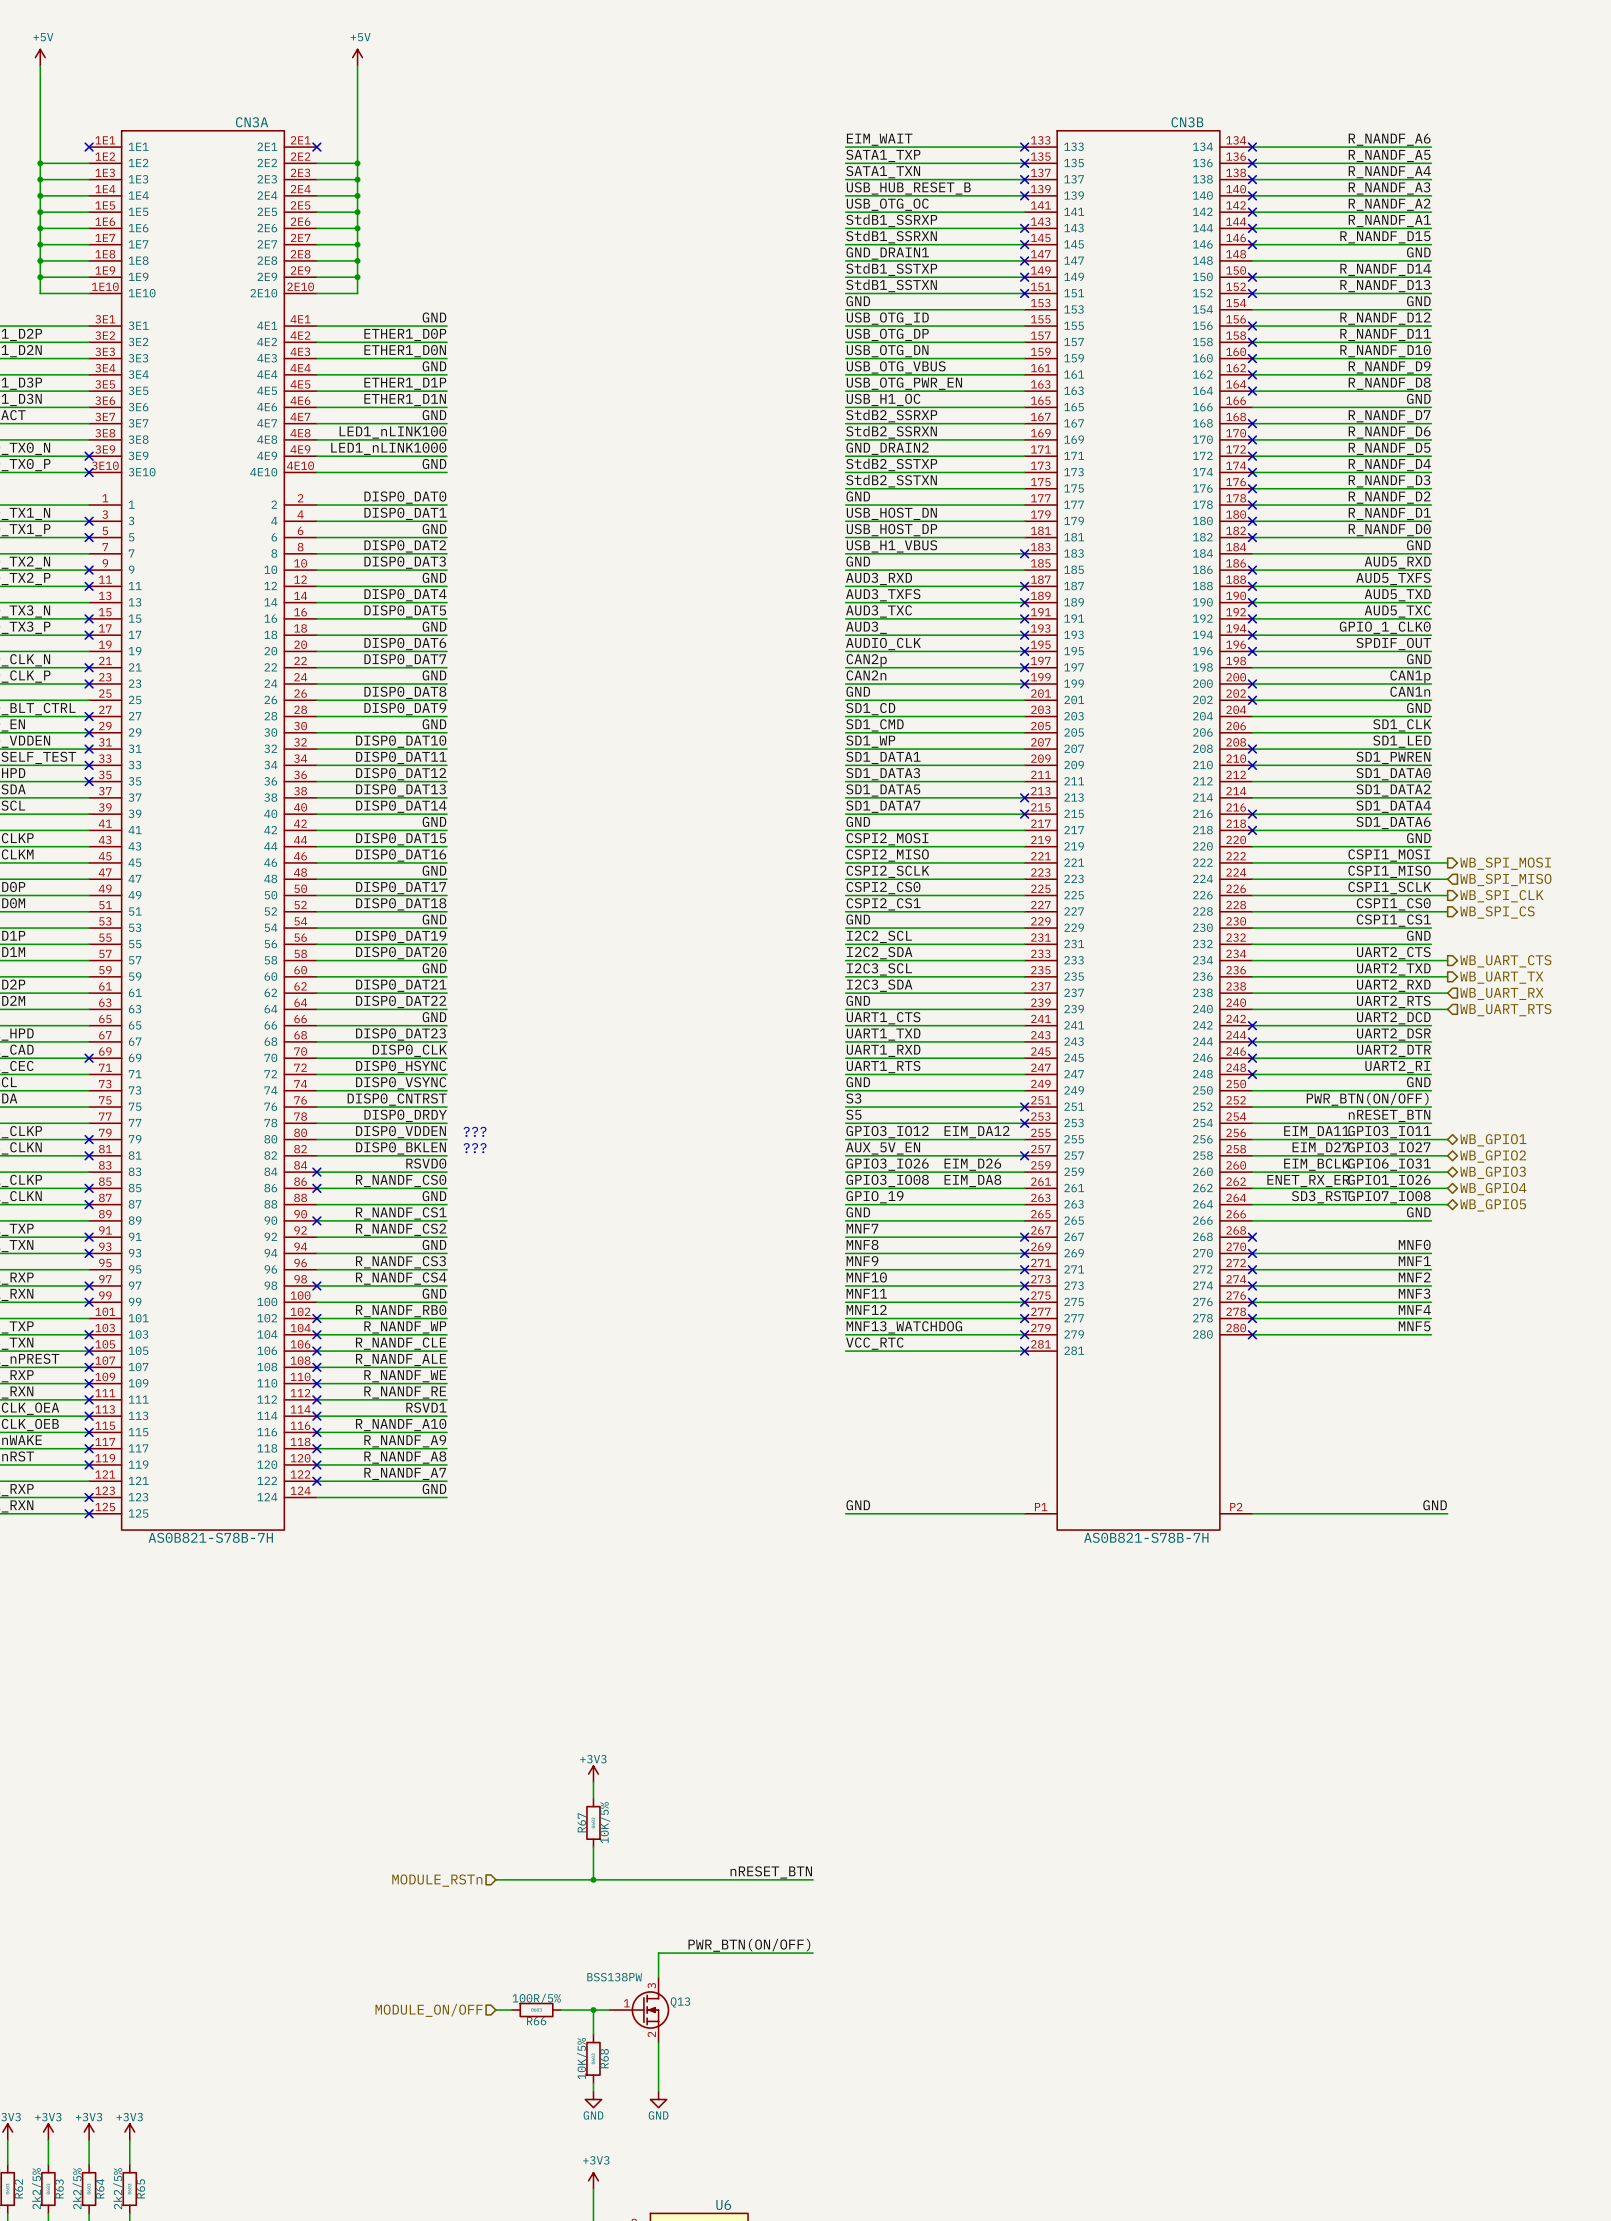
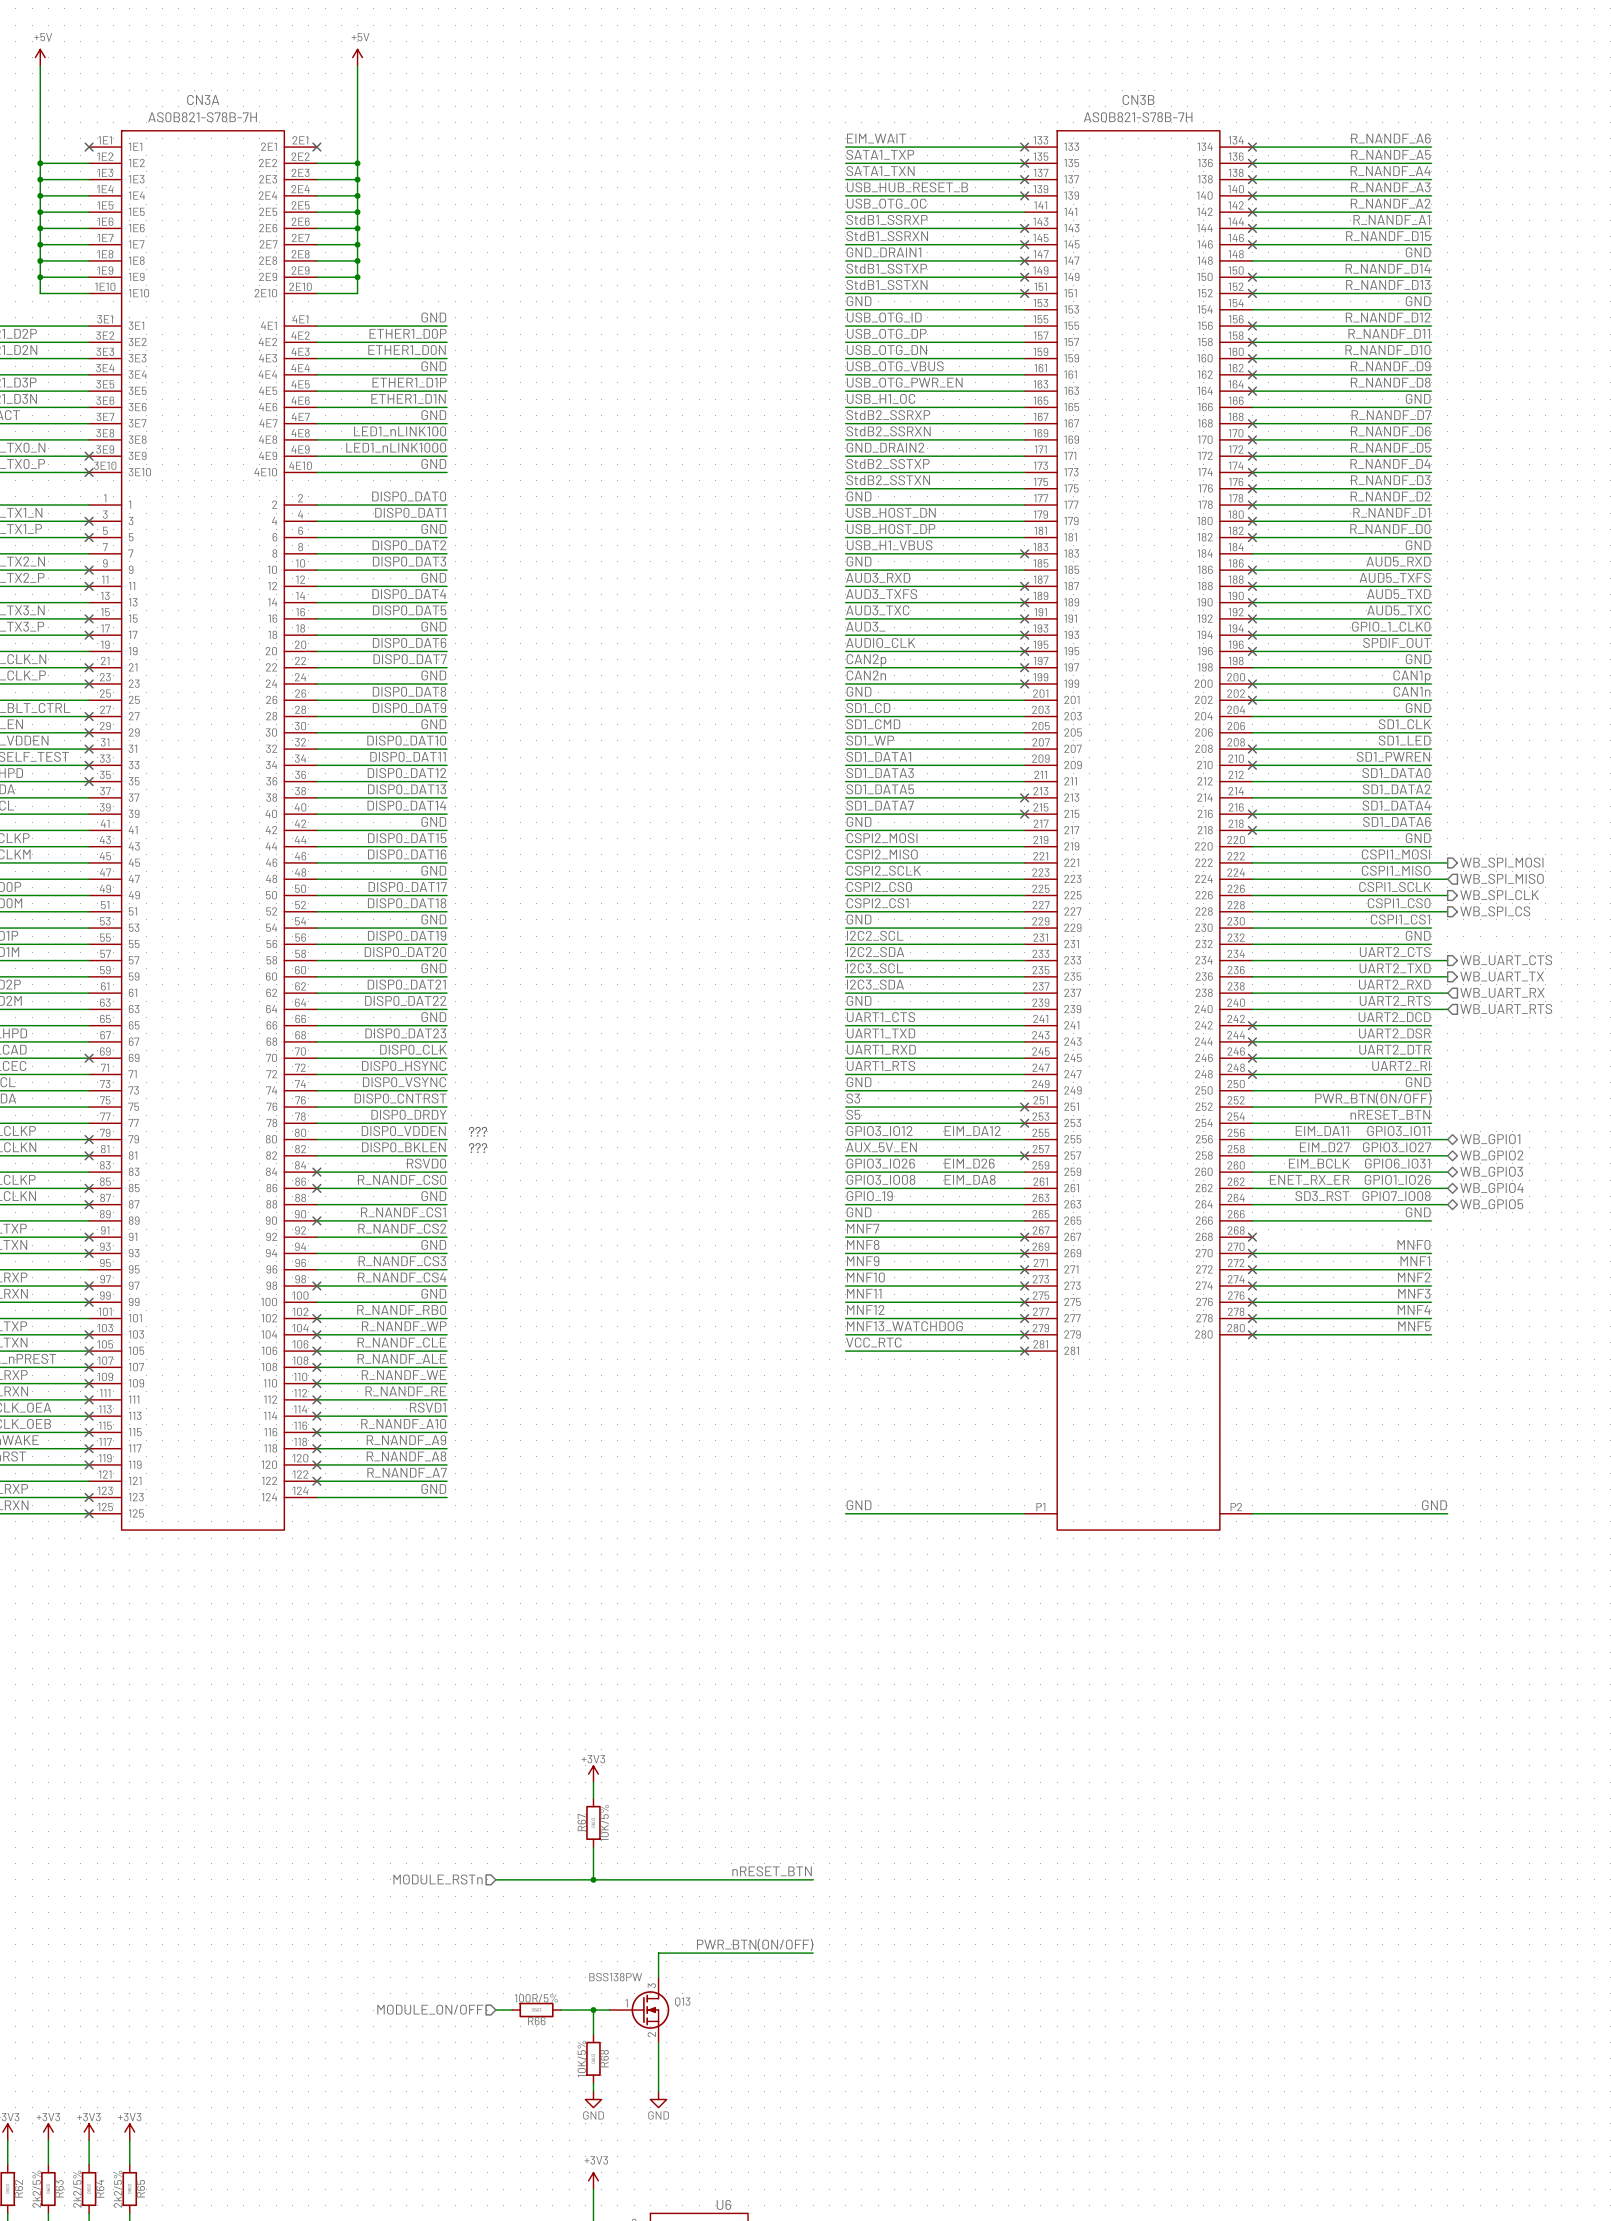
CN3A name position: CN3A (252, 122) -> CN3A (203, 100)
CN3B name position: CN3B (1187, 122) -> CN3B (1138, 100)
CN3A value position: AS0B821-S78B-7H (210, 1537) -> AS0B821-S78B-7H (202, 117)
CN3B value position: AS0B821-S78B-7H (1146, 1537) -> AS0B821-S78B-7H (1138, 117)

